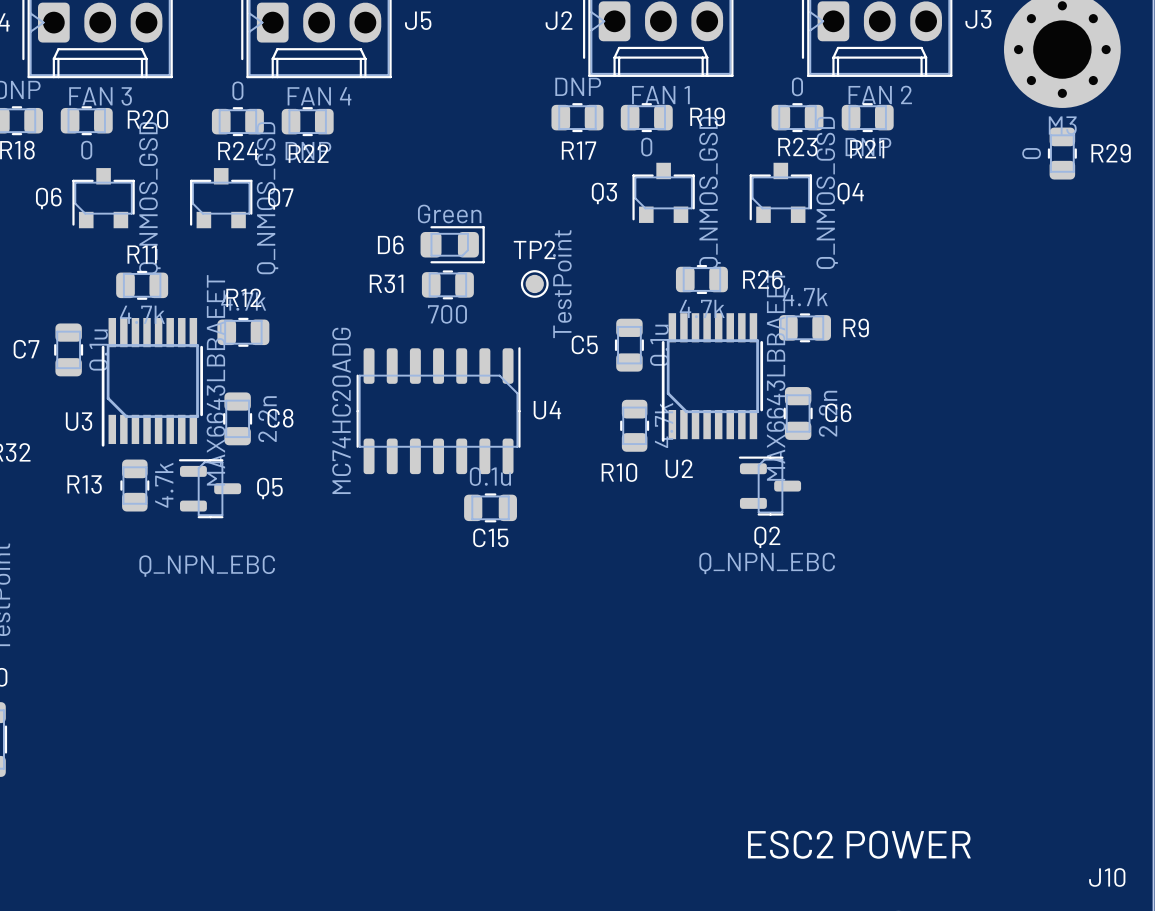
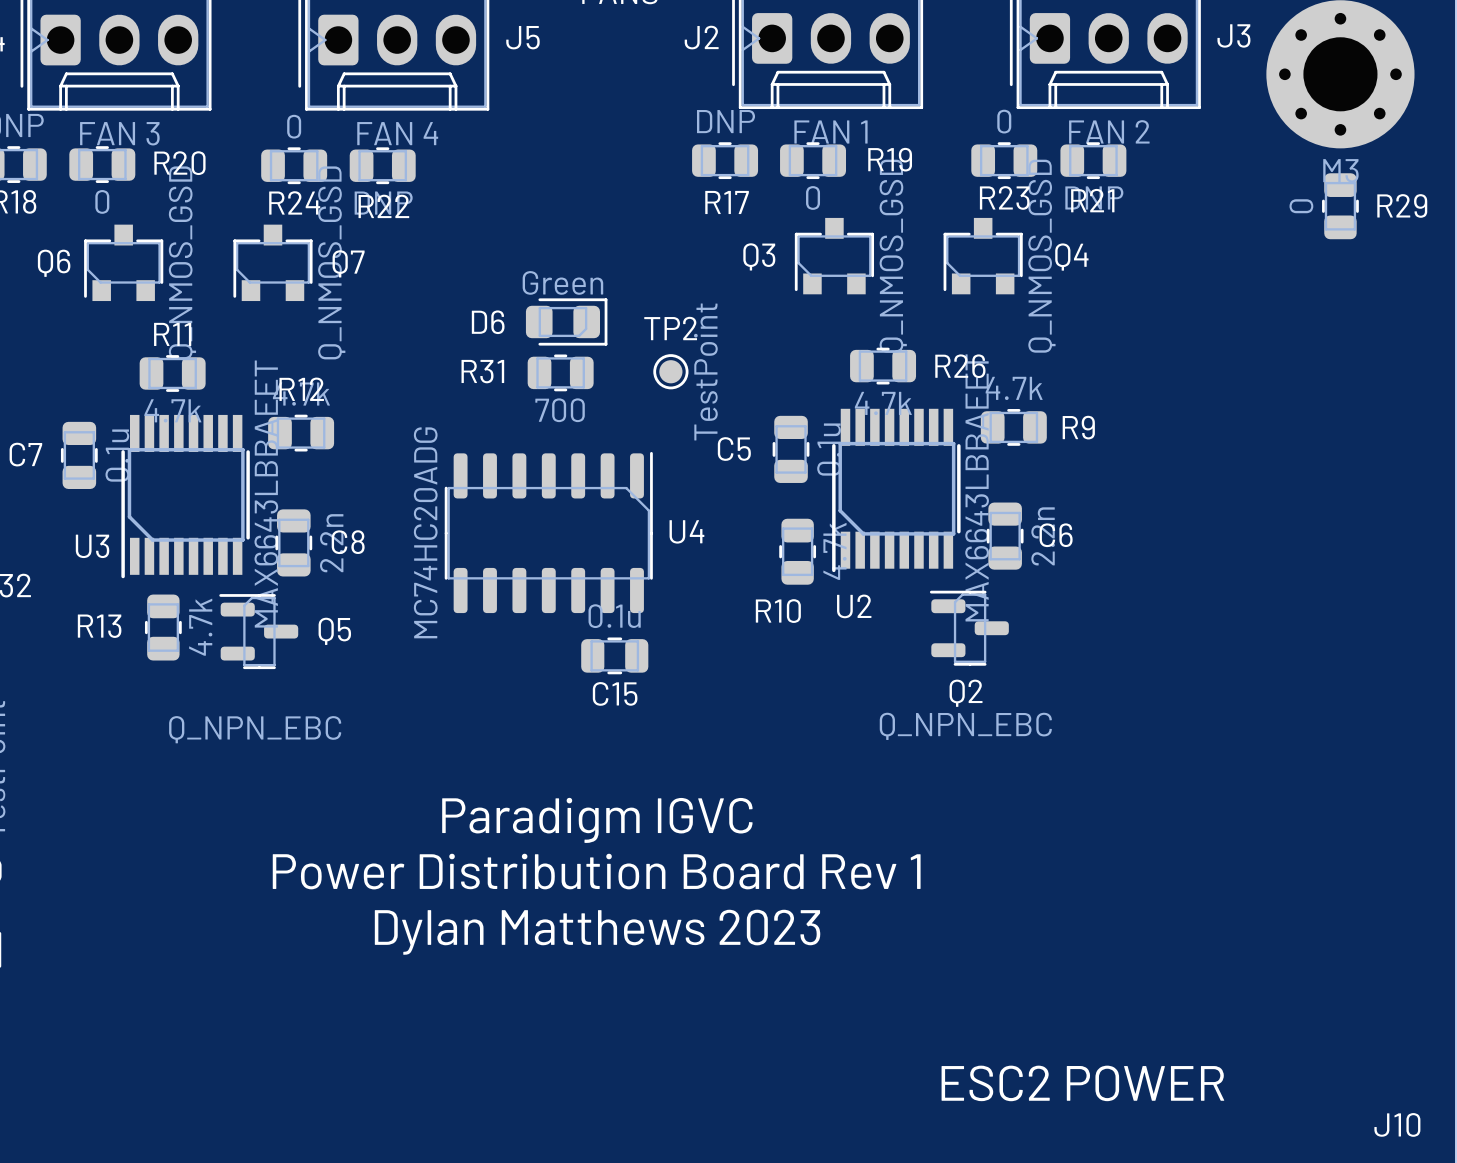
text: none -> Paradigm IGVC (597, 820)
text: none -> Power Distribution Board Rev 1 (596, 871)
text: none -> Dylan Matthews 2023 (597, 932)

